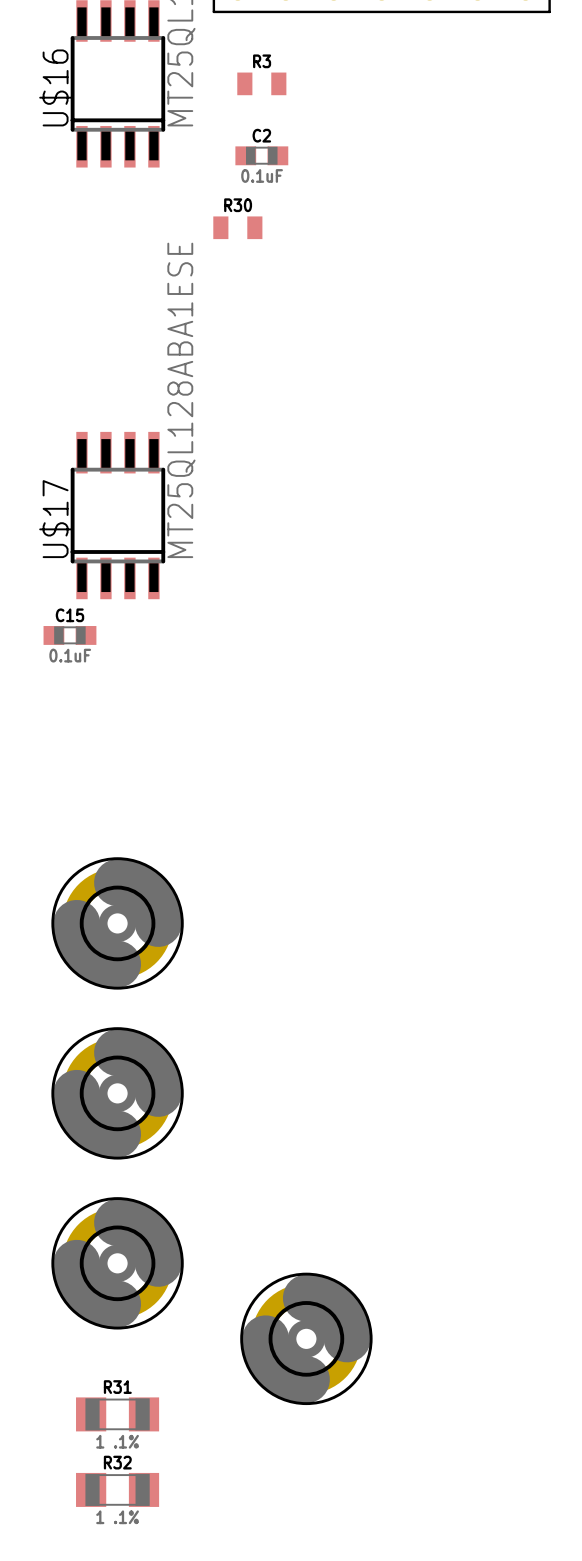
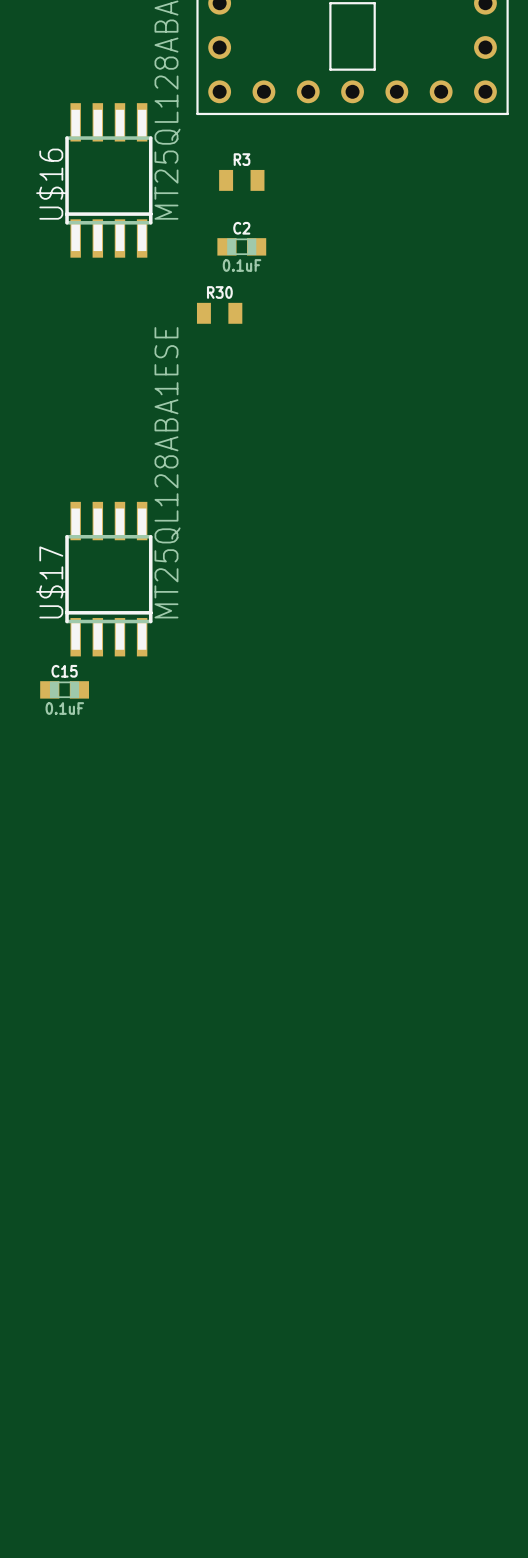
part: (117, 923) -> none
part: (117, 1093) -> none
part: (117, 1263) -> none
part: (306, 1338) -> none
R31: 1 .1% (117, 1414) -> none
R32: 1 .1% (117, 1489) -> none

